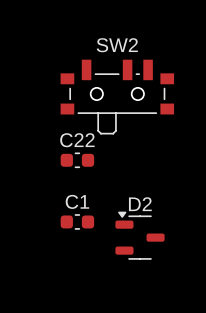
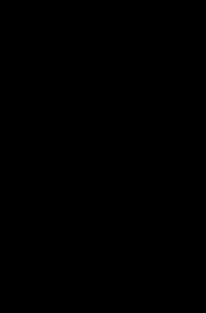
SW2: (117, 97) -> none
C22: (77, 160) -> none
C1: (77, 221) -> none
D2: (140, 235) -> none

